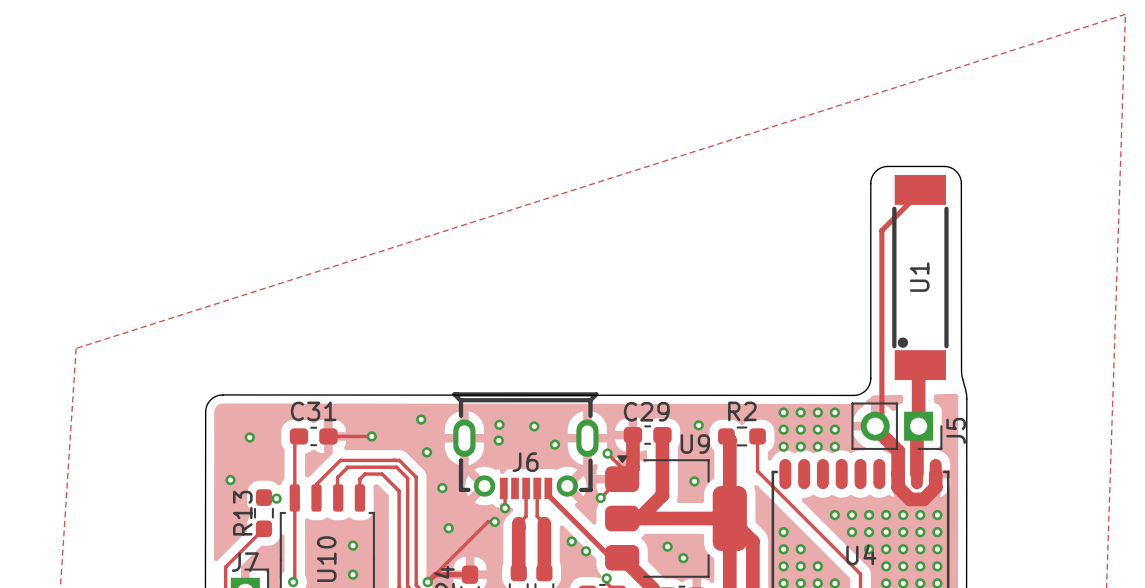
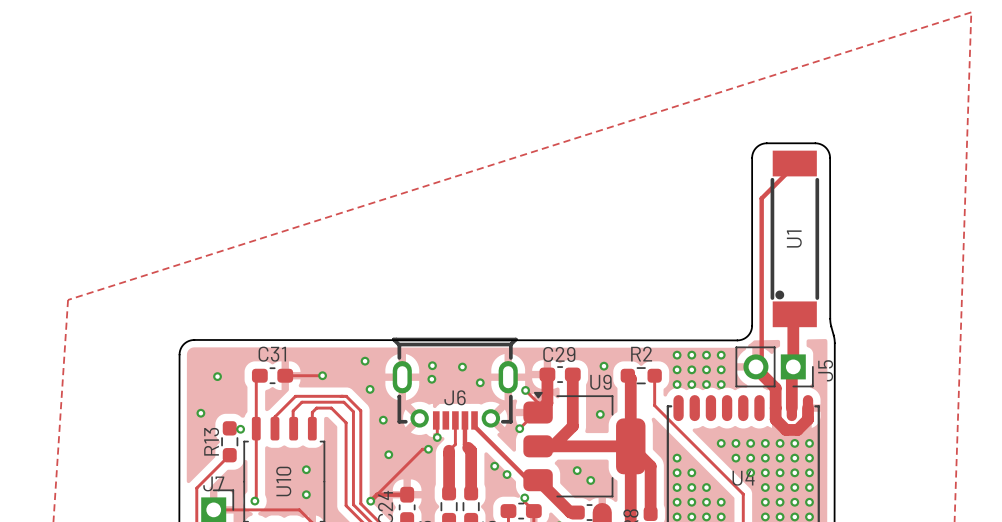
track width: thin (537, 488) (537, 516) (544, 523) -> thick (464, 420) (464, 444) (471, 450)

